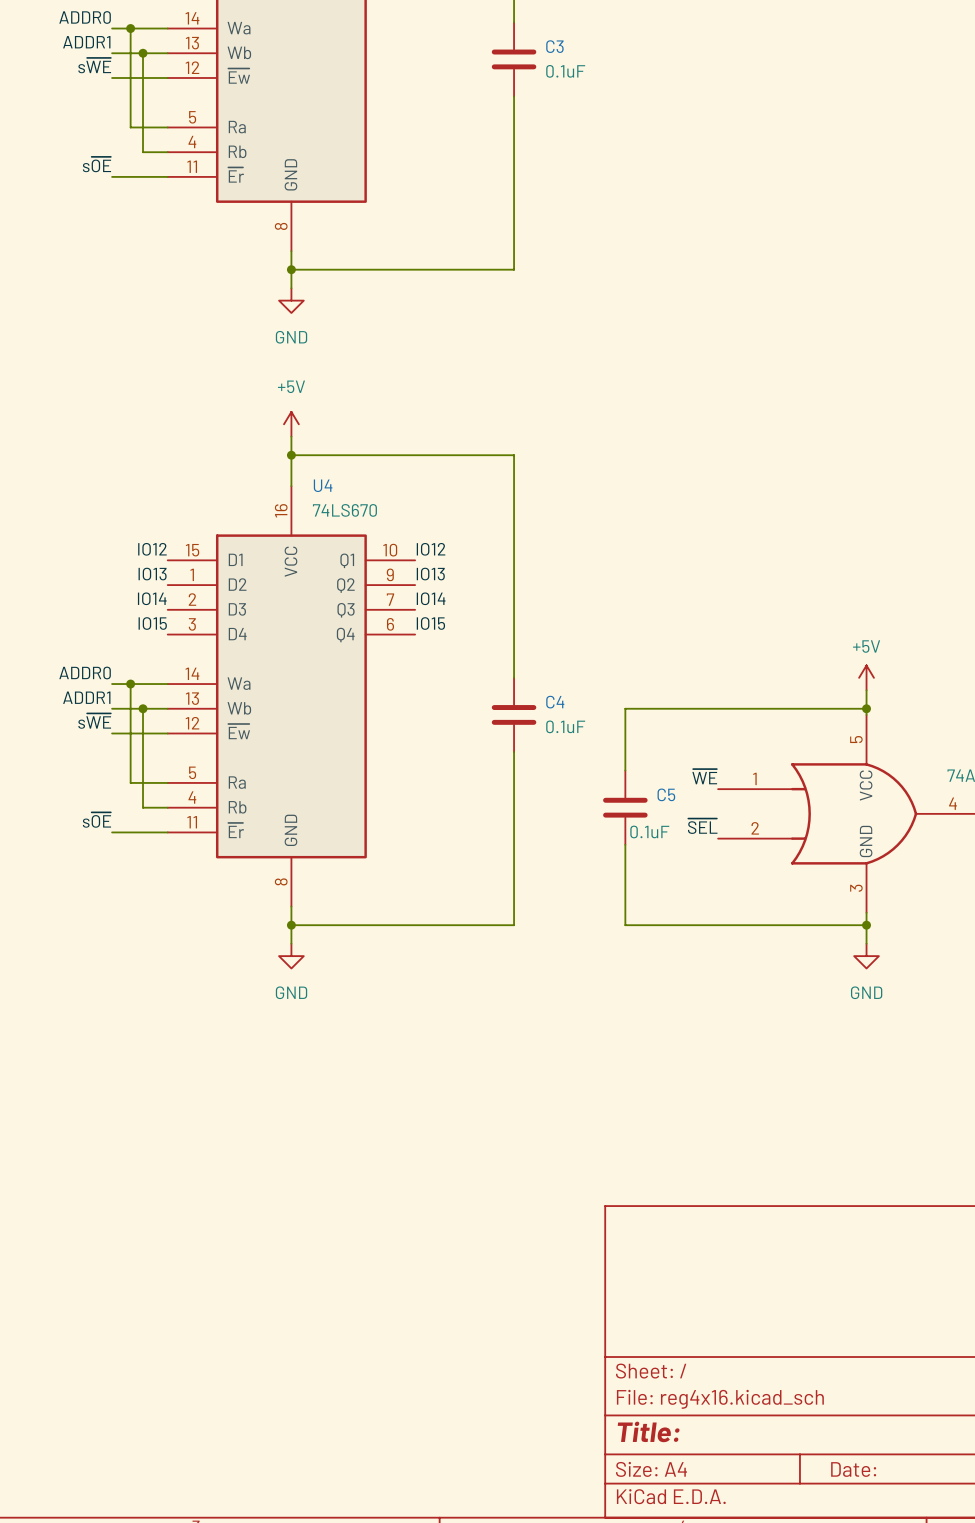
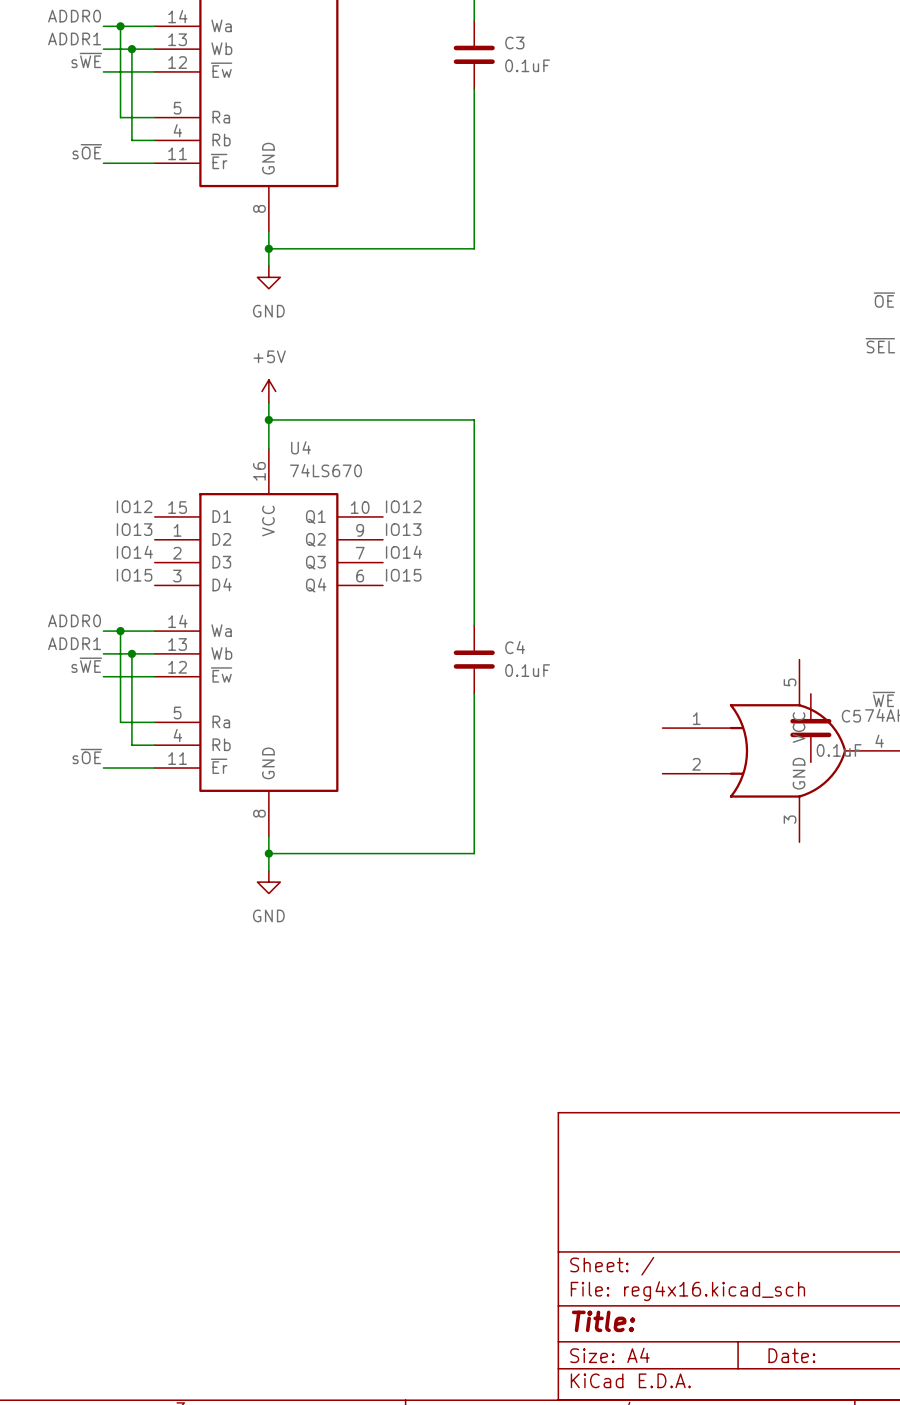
label: none -> ~{OE} (884, 300)
label: none -> ~{SEL} (880, 345)
power symbol: +5V (866, 677) -> none
wire: (866, 690) (866, 714) -> none
wire: (866, 708) (625, 708) (625, 770) -> none
junction: (866, 708) -> none
label: none -> ~{WE} (883, 699)
label: ~{WE} (704, 776) -> none
C5 position: (625, 807) -> (810, 728)
label: ~{SEL} (702, 826) -> none
wire: (625, 844) (625, 925) (866, 925) -> none
wire: (866, 912) (866, 943) -> none
junction: (866, 925) -> none
power symbol: GND (866, 956) -> none

